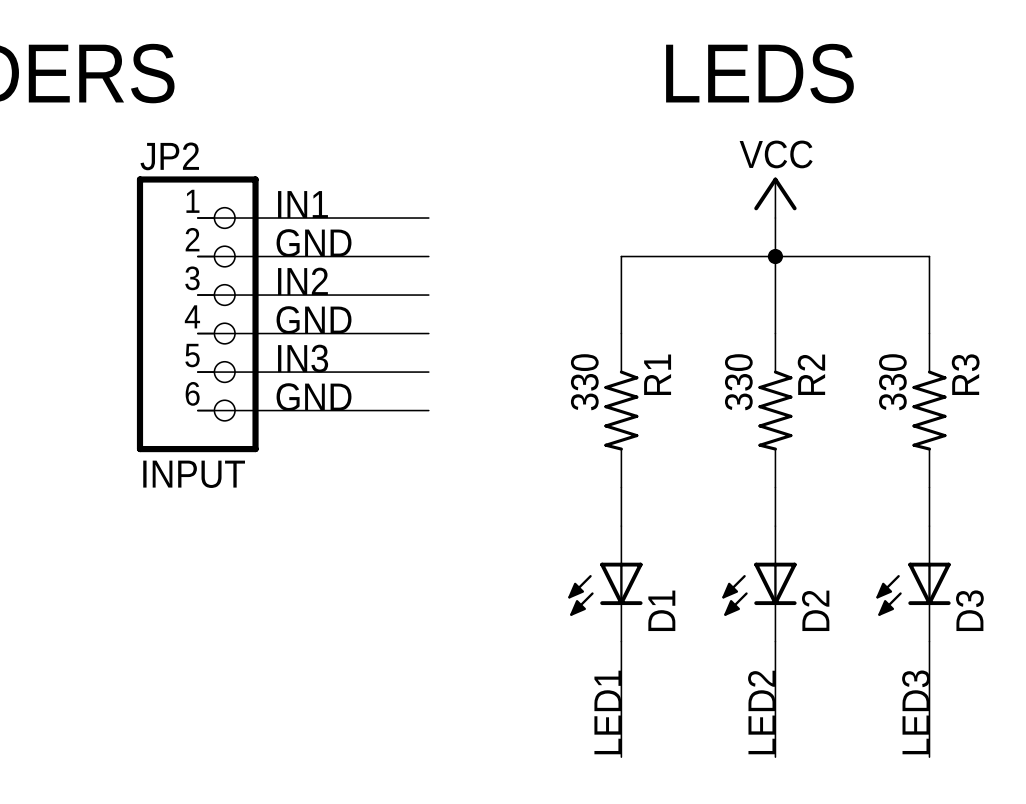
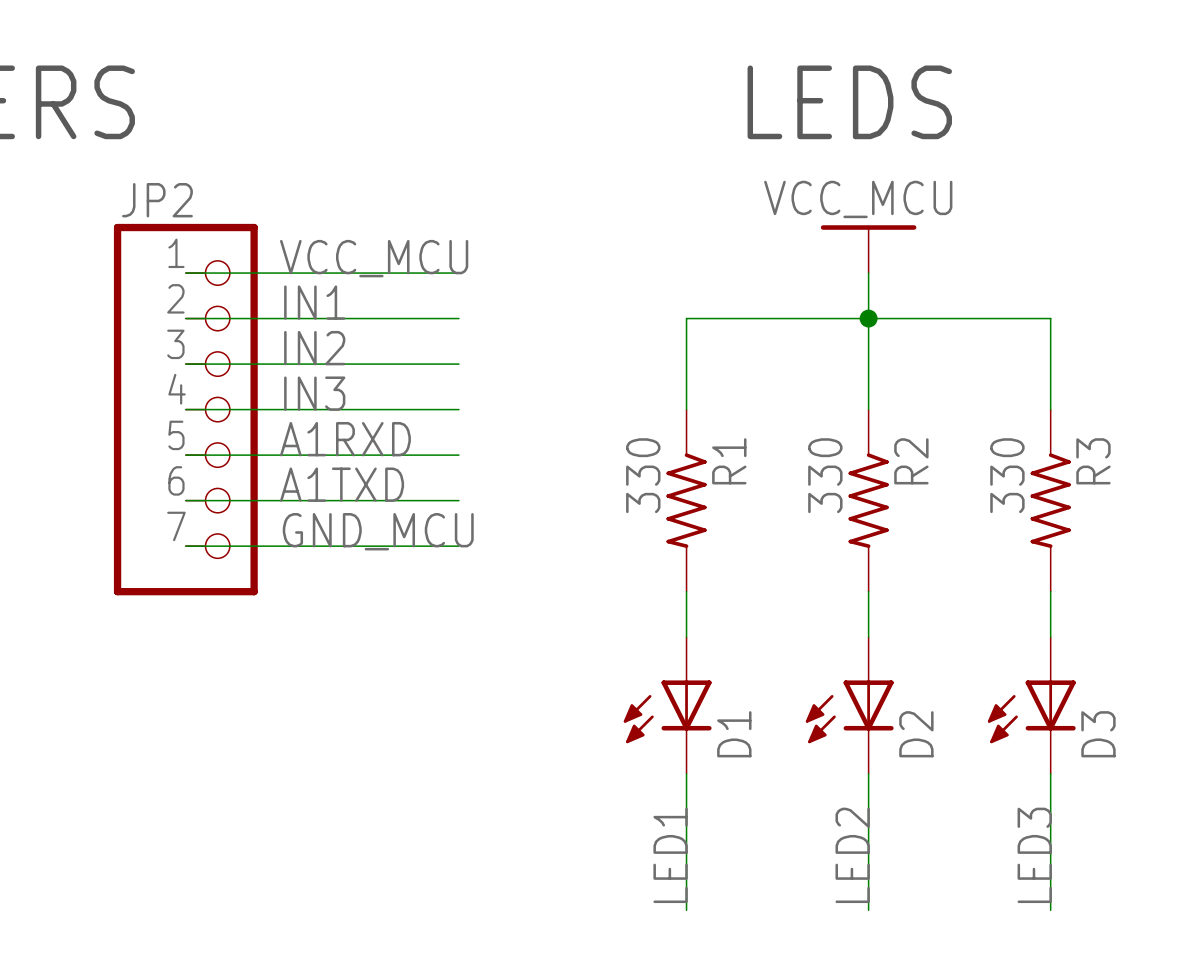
JP2 symbol: [136, 176, 259, 453] -> [113, 223, 258, 596]
power symbol: VCC (775, 197) -> VCC_MCU (868, 249)
label: IN1 (302, 204) -> VCC_MCU (374, 258)
label: GND (314, 243) -> IN1 (314, 302)
label: GND (314, 320) -> IN3 (314, 393)
label: IN3 (303, 358) -> A1RXD (345, 439)
label: GND (314, 397) -> A1TXD (342, 484)
label: none -> GND_MCU (378, 531)
wire: none -> (185, 546) (458, 546)
JP2 value: INPUT (194, 474) -> none

